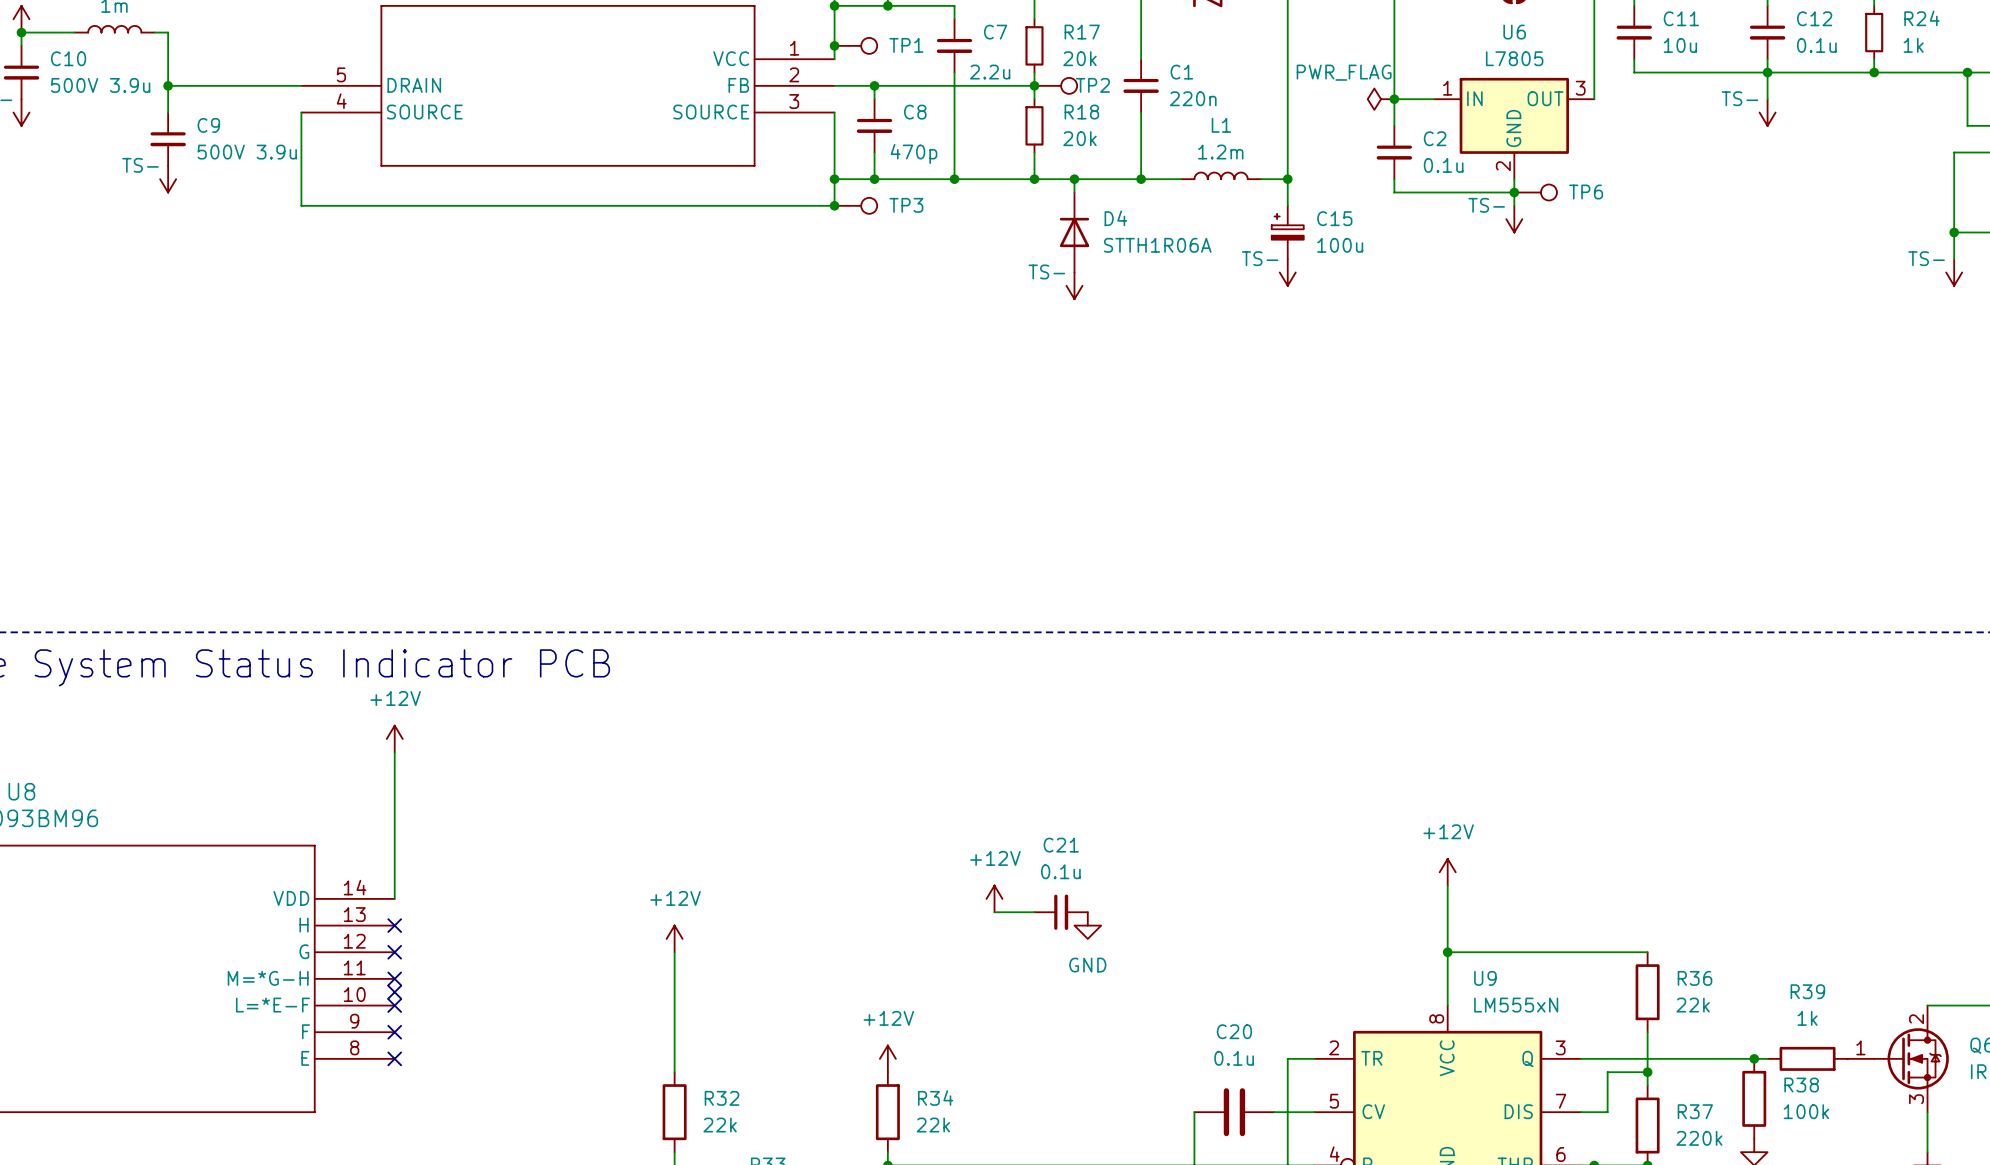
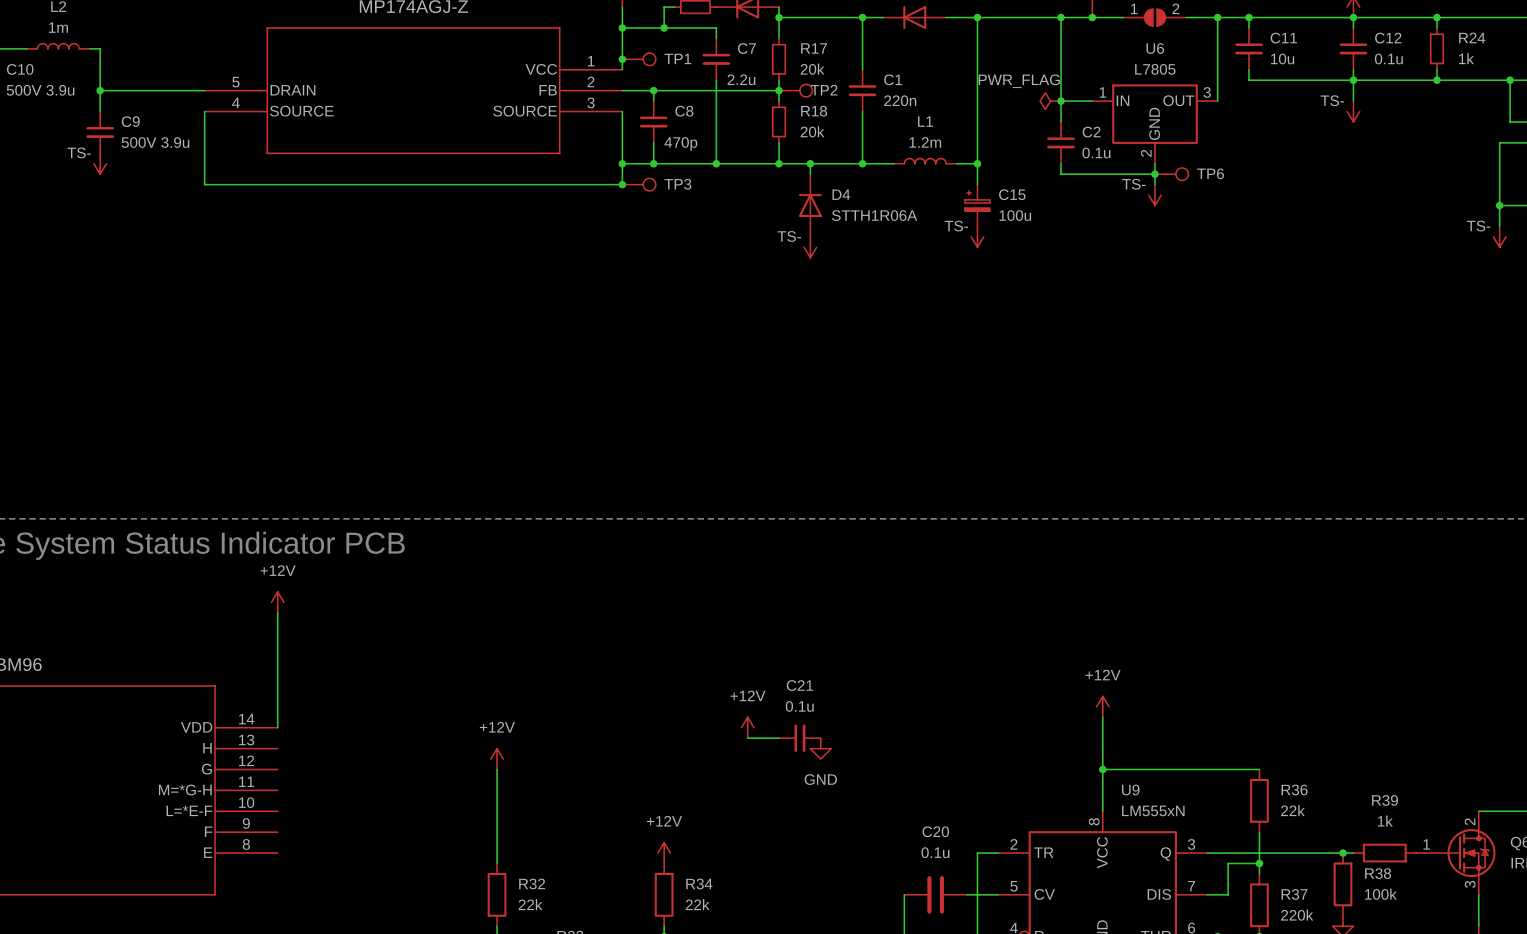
no-connect mark: (394, 925) -> none
no-connect mark: (394, 952) -> none
no-connect mark: (394, 978) -> none
no-connect mark: (394, 992) -> none
no-connect mark: (394, 1005) -> none
no-connect mark: (394, 1032) -> none
no-connect mark: (394, 1058) -> none

